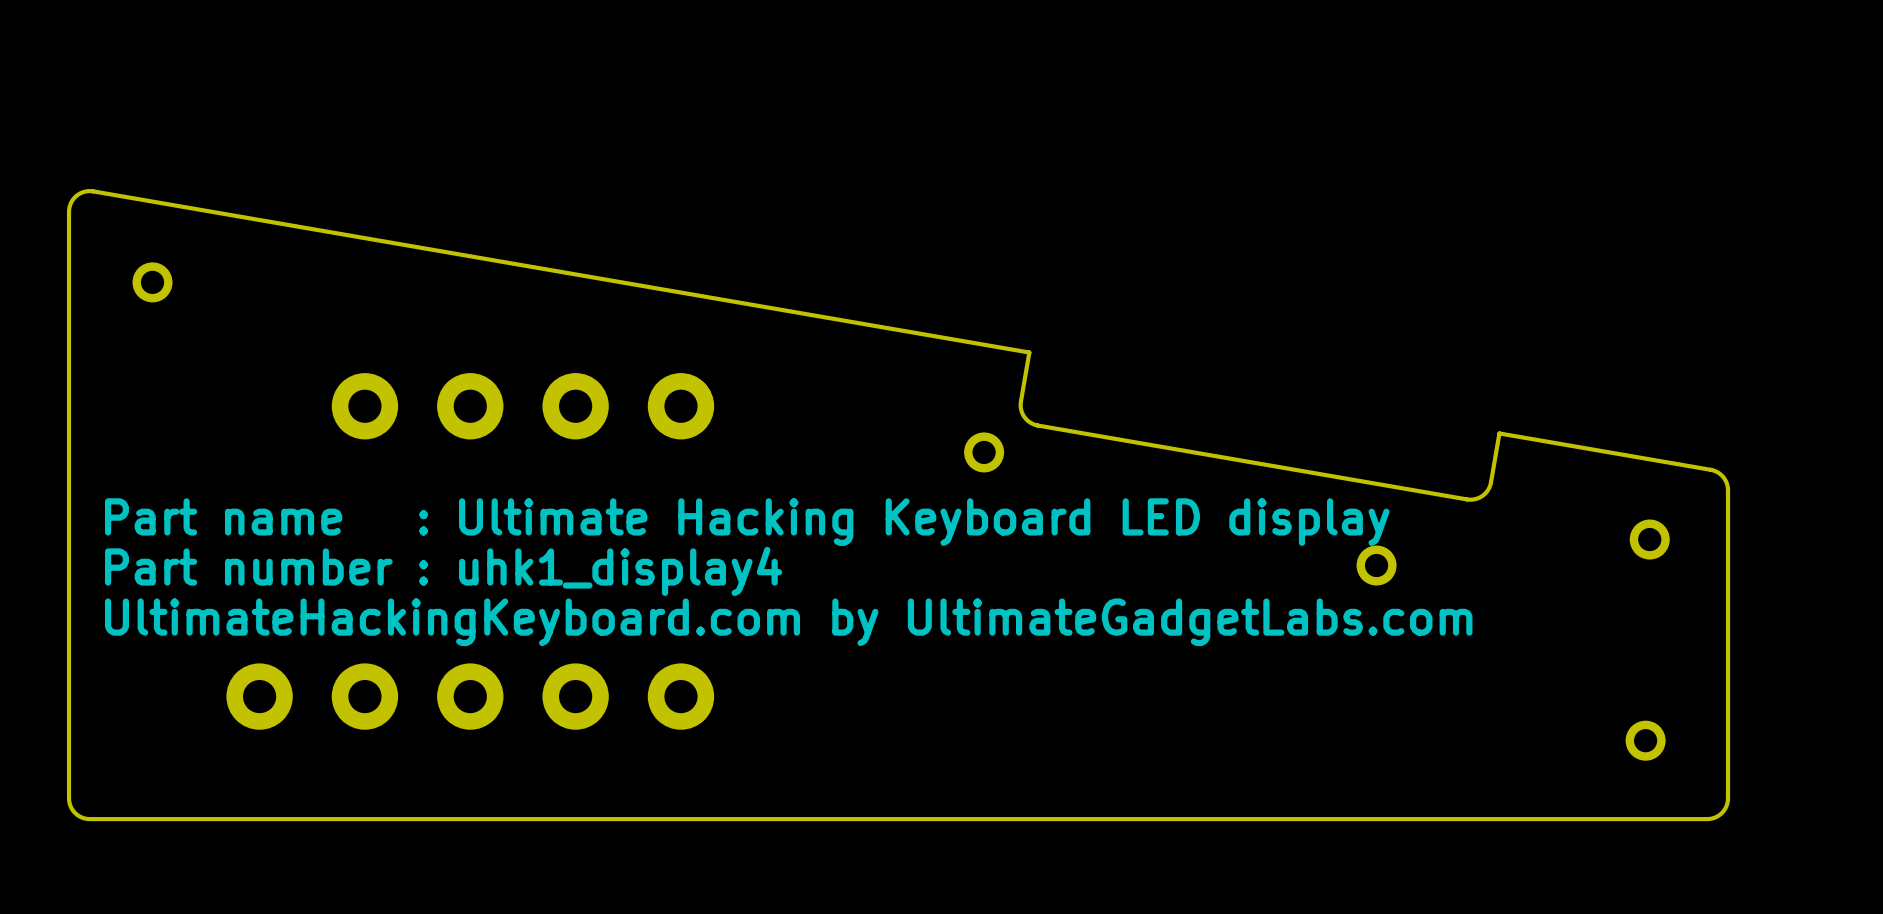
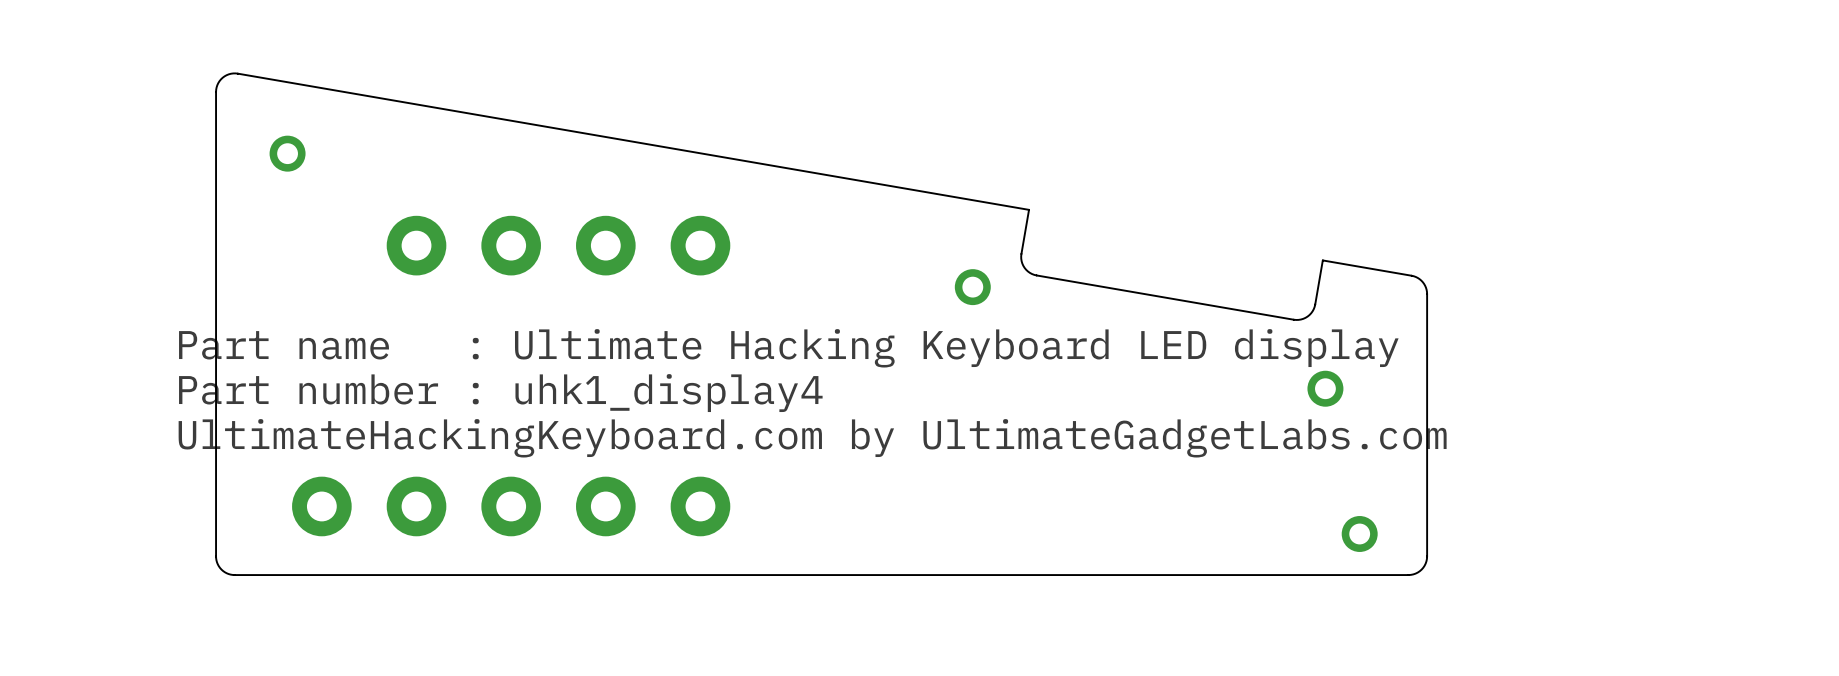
board edge: (93, 191) (1029, 352) (1020, 406) (1026, 419) (1037, 425) (1469, 499) (1482, 495) (1489, 487) (1499, 433) (1715, 471) (1724, 478) (1728, 490) (1728, 798) (1726, 806) (1719, 814) (1707, 819) (89, 819) (81, 817) (73, 810) (69, 798) (69, 211) (71, 201) (76, 195) (83, 192) (93, 191) -> (237, 73) (228, 74) (222, 77) (218, 83) (216, 92) (216, 556) (220, 568) (228, 573) (1408, 575) (1417, 572) (1425, 563) (1427, 294) (1424, 283) (1415, 276) (1322, 260) (1313, 309) (1307, 316) (1296, 319) (1036, 275) (1026, 269) (1021, 258) (1029, 209) (237, 73)
part position: (152, 282) -> (287, 153)
part: (1649, 539) -> none
part: none -> (1359, 533)
part: (1645, 740) -> none

